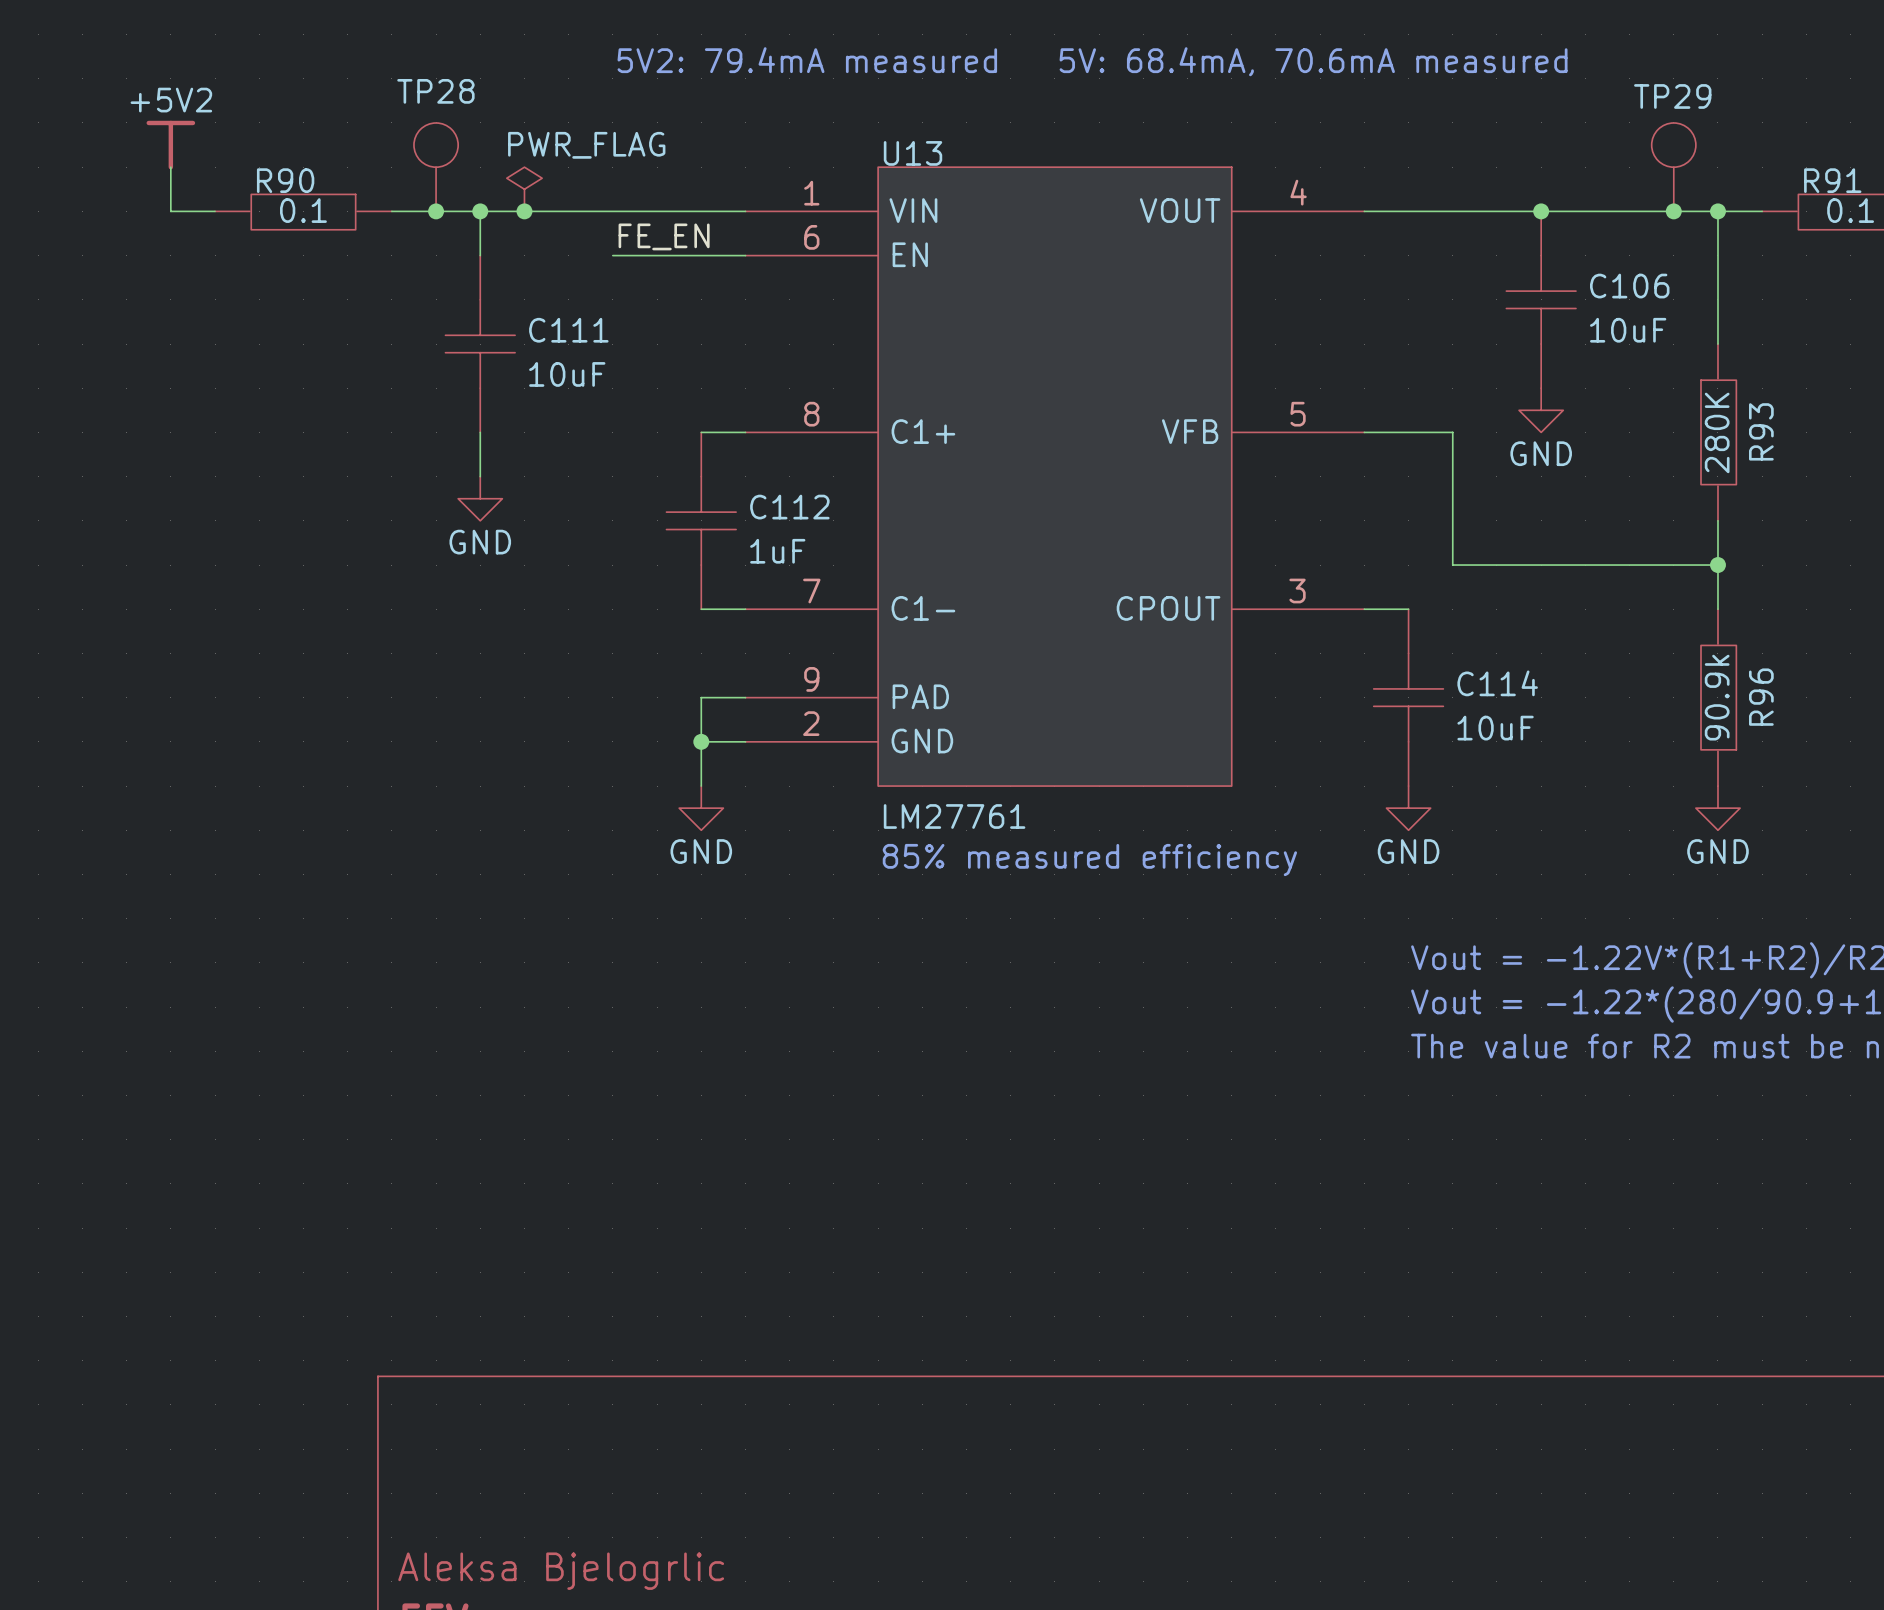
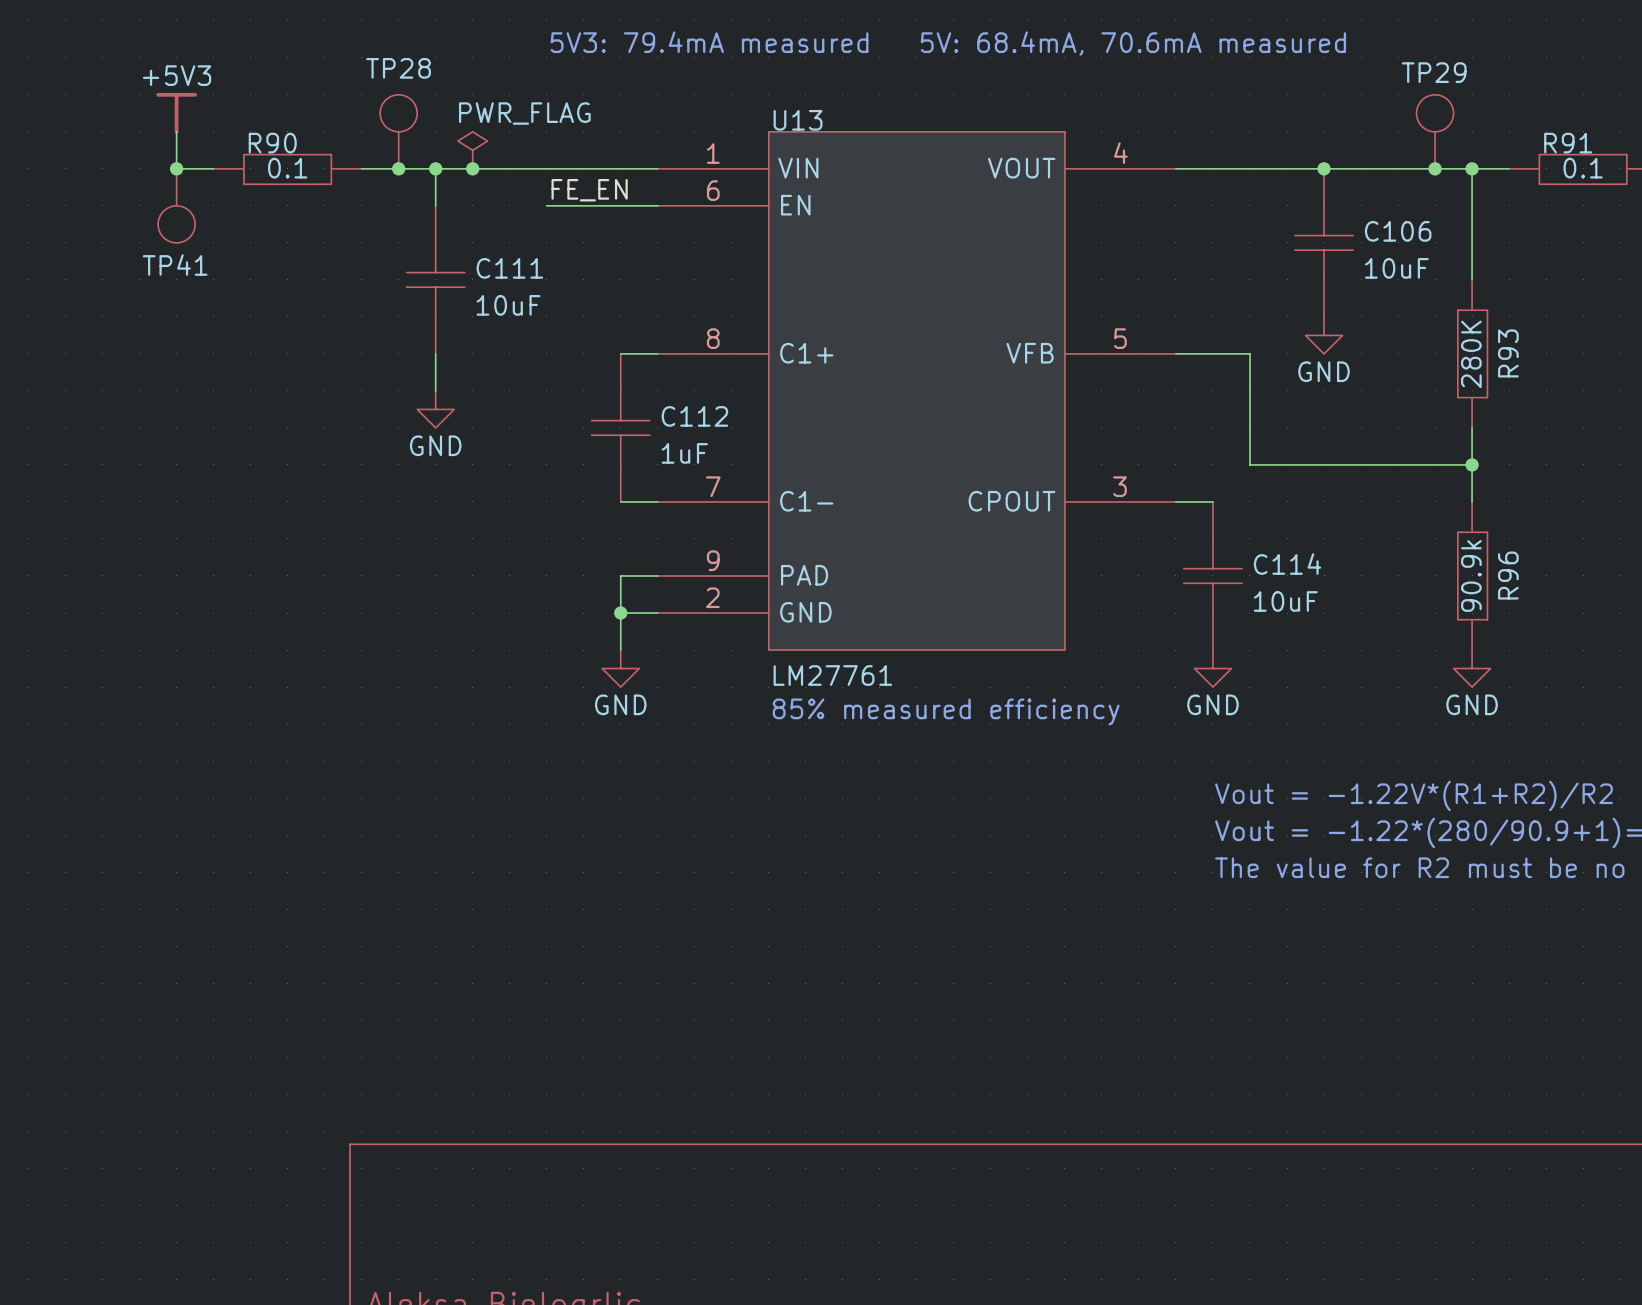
text: 5V2: 79.4mA measured (807, 60) -> 5V3: 79.4mA measured (709, 42)
power symbol: +5V2 (170, 145) -> +5V3 (176, 113)
junction: none -> (176, 168)
TP41: none -> (176, 205)

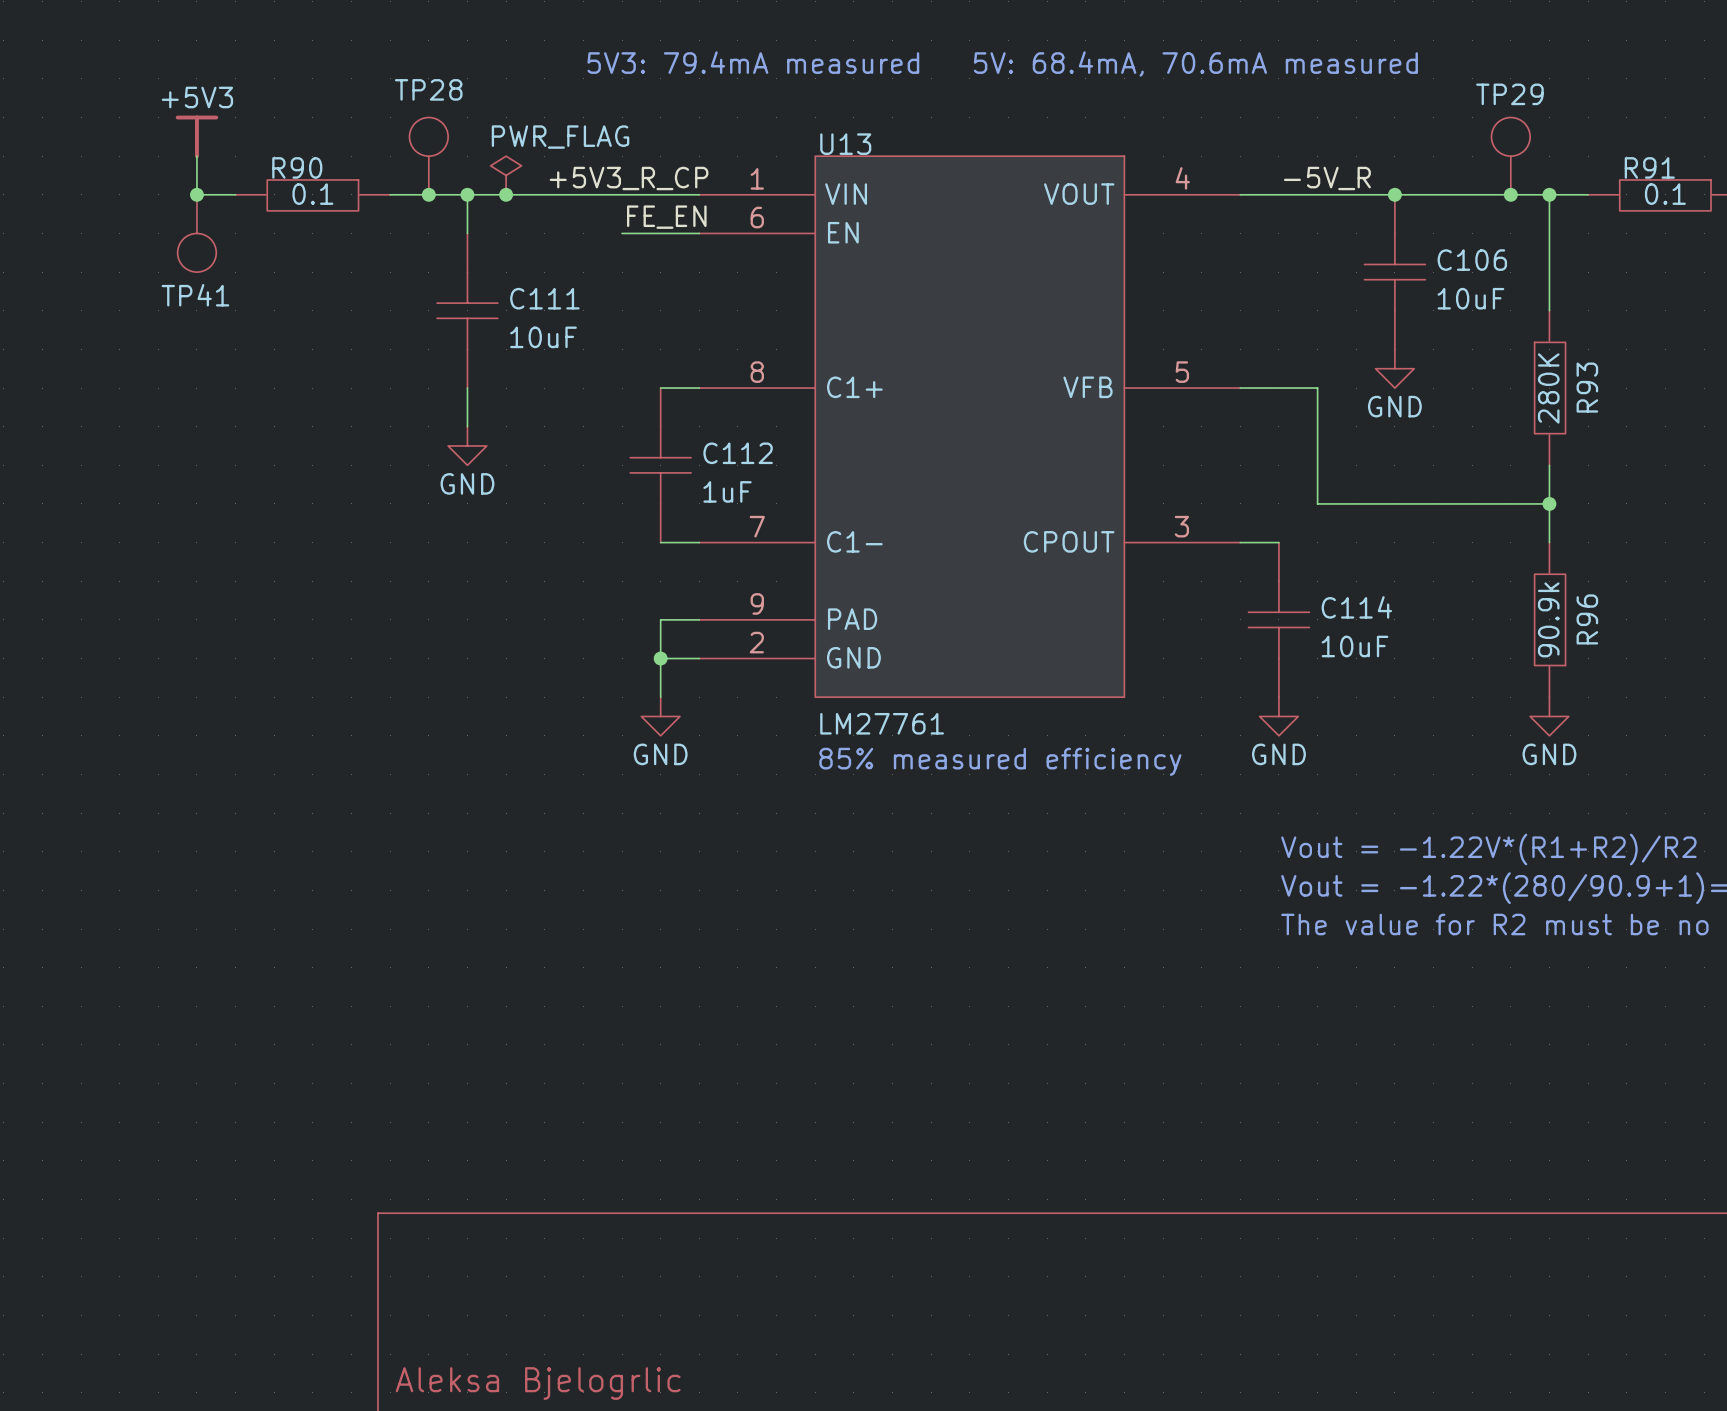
label: none -> +5V3_R_CP (629, 178)
label: none -> -5V_R (1327, 178)
label position: FE_EN (589, 190) -> FE_EN (666, 217)
wire: (546, 205) (583, 205) -> none

